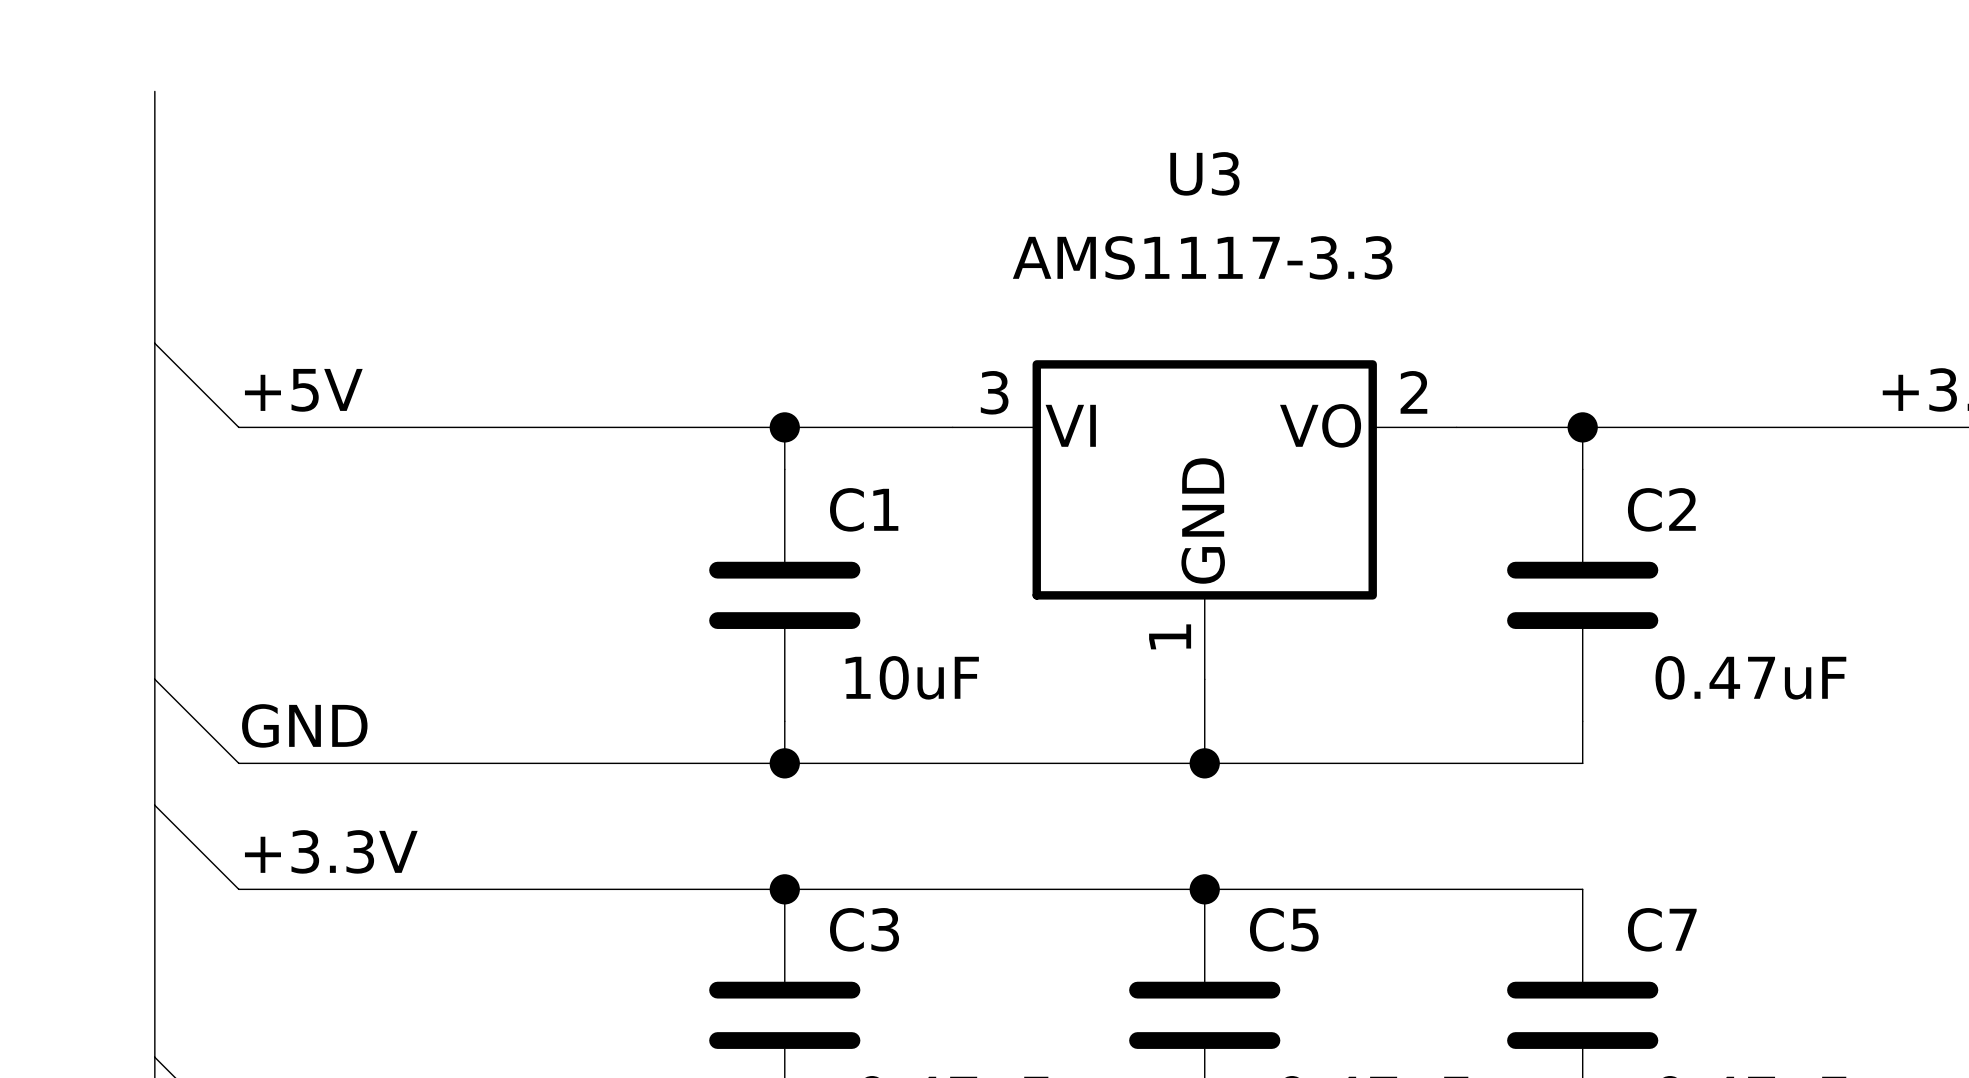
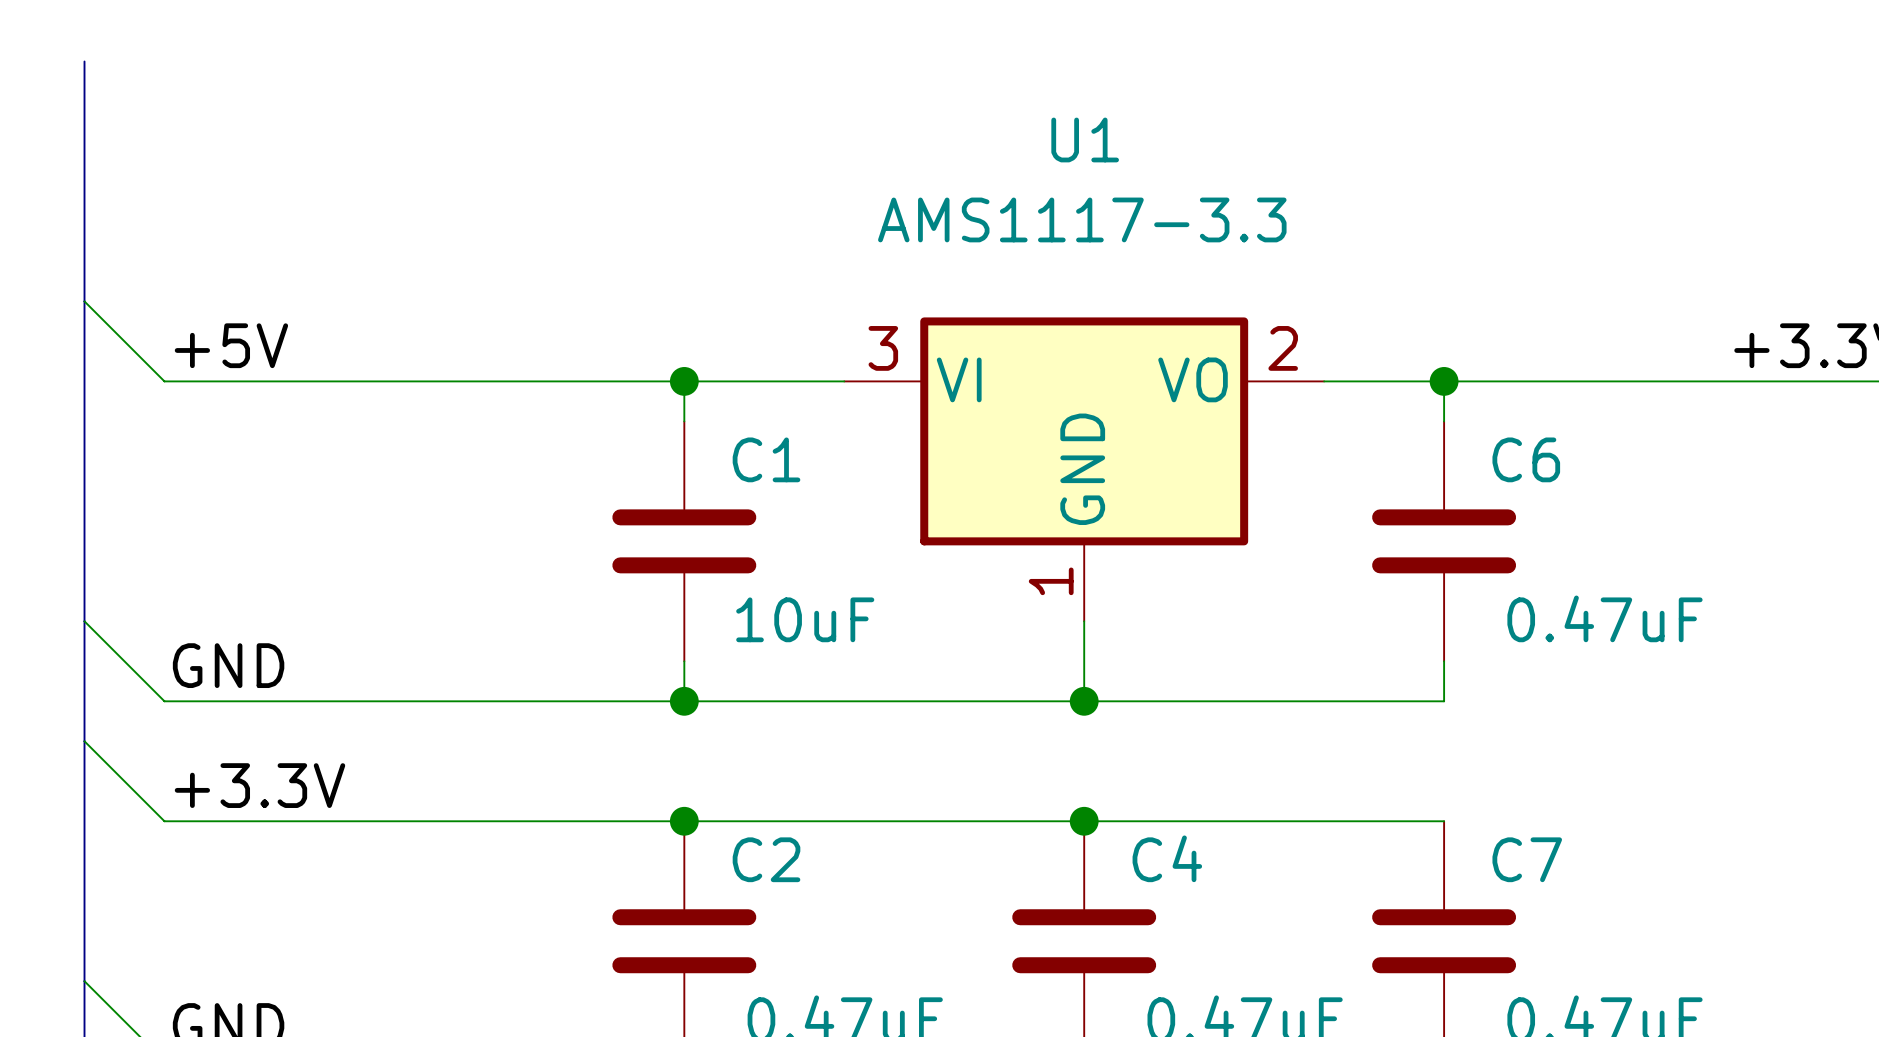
U3 name: U3 (1204, 173) -> U1 (1085, 139)
C2 name: C2 (1661, 509) -> C6 (1526, 459)
C3 name: C3 (864, 929) -> C2 (766, 859)
C5 name: C5 (1284, 929) -> C4 (1167, 858)

